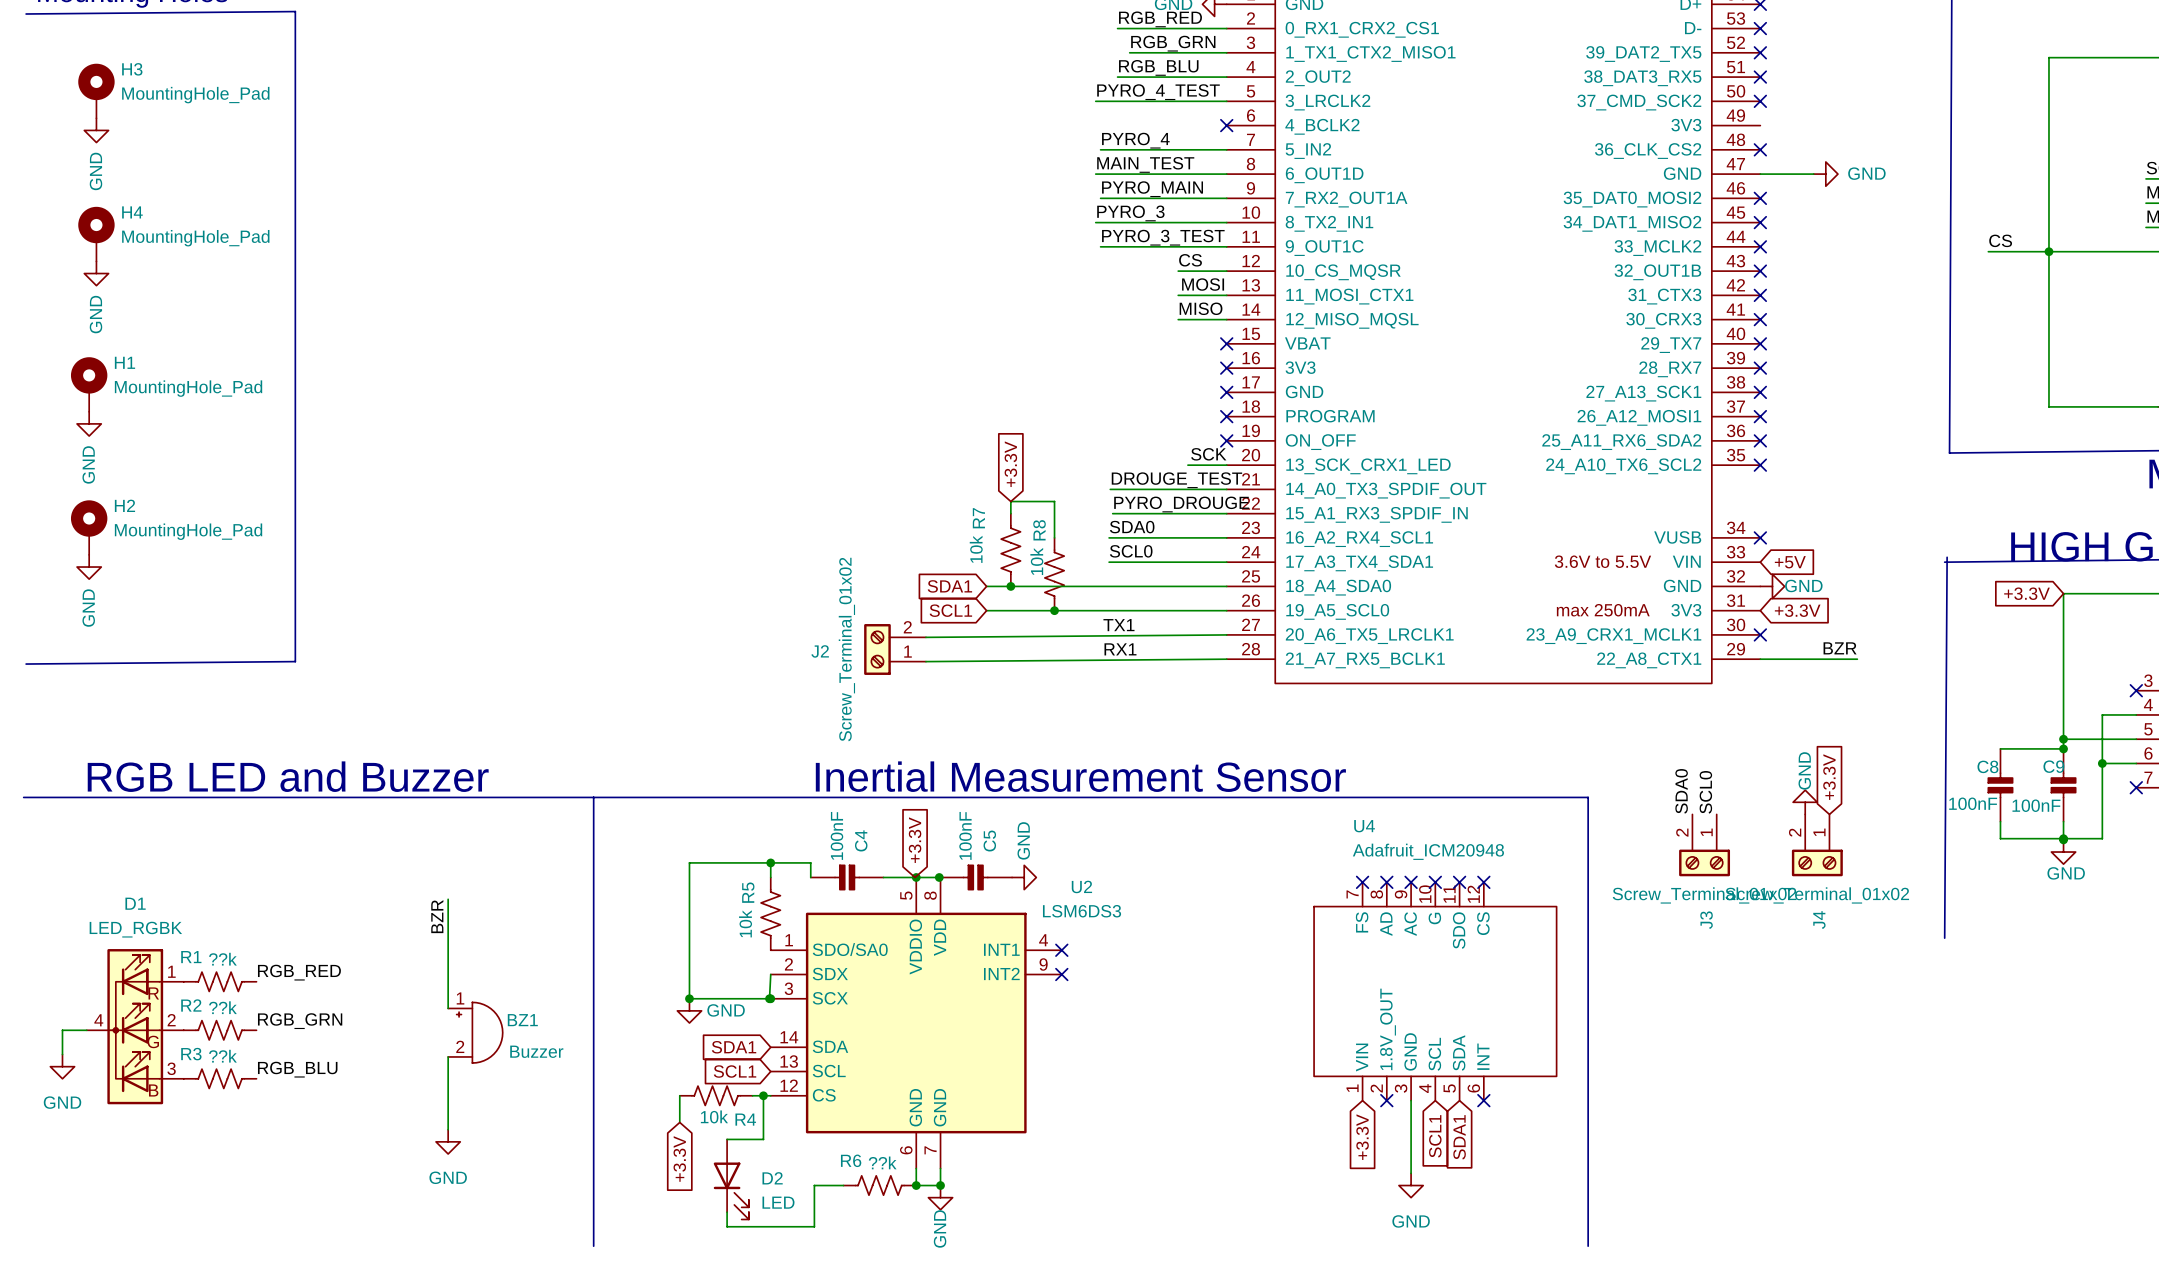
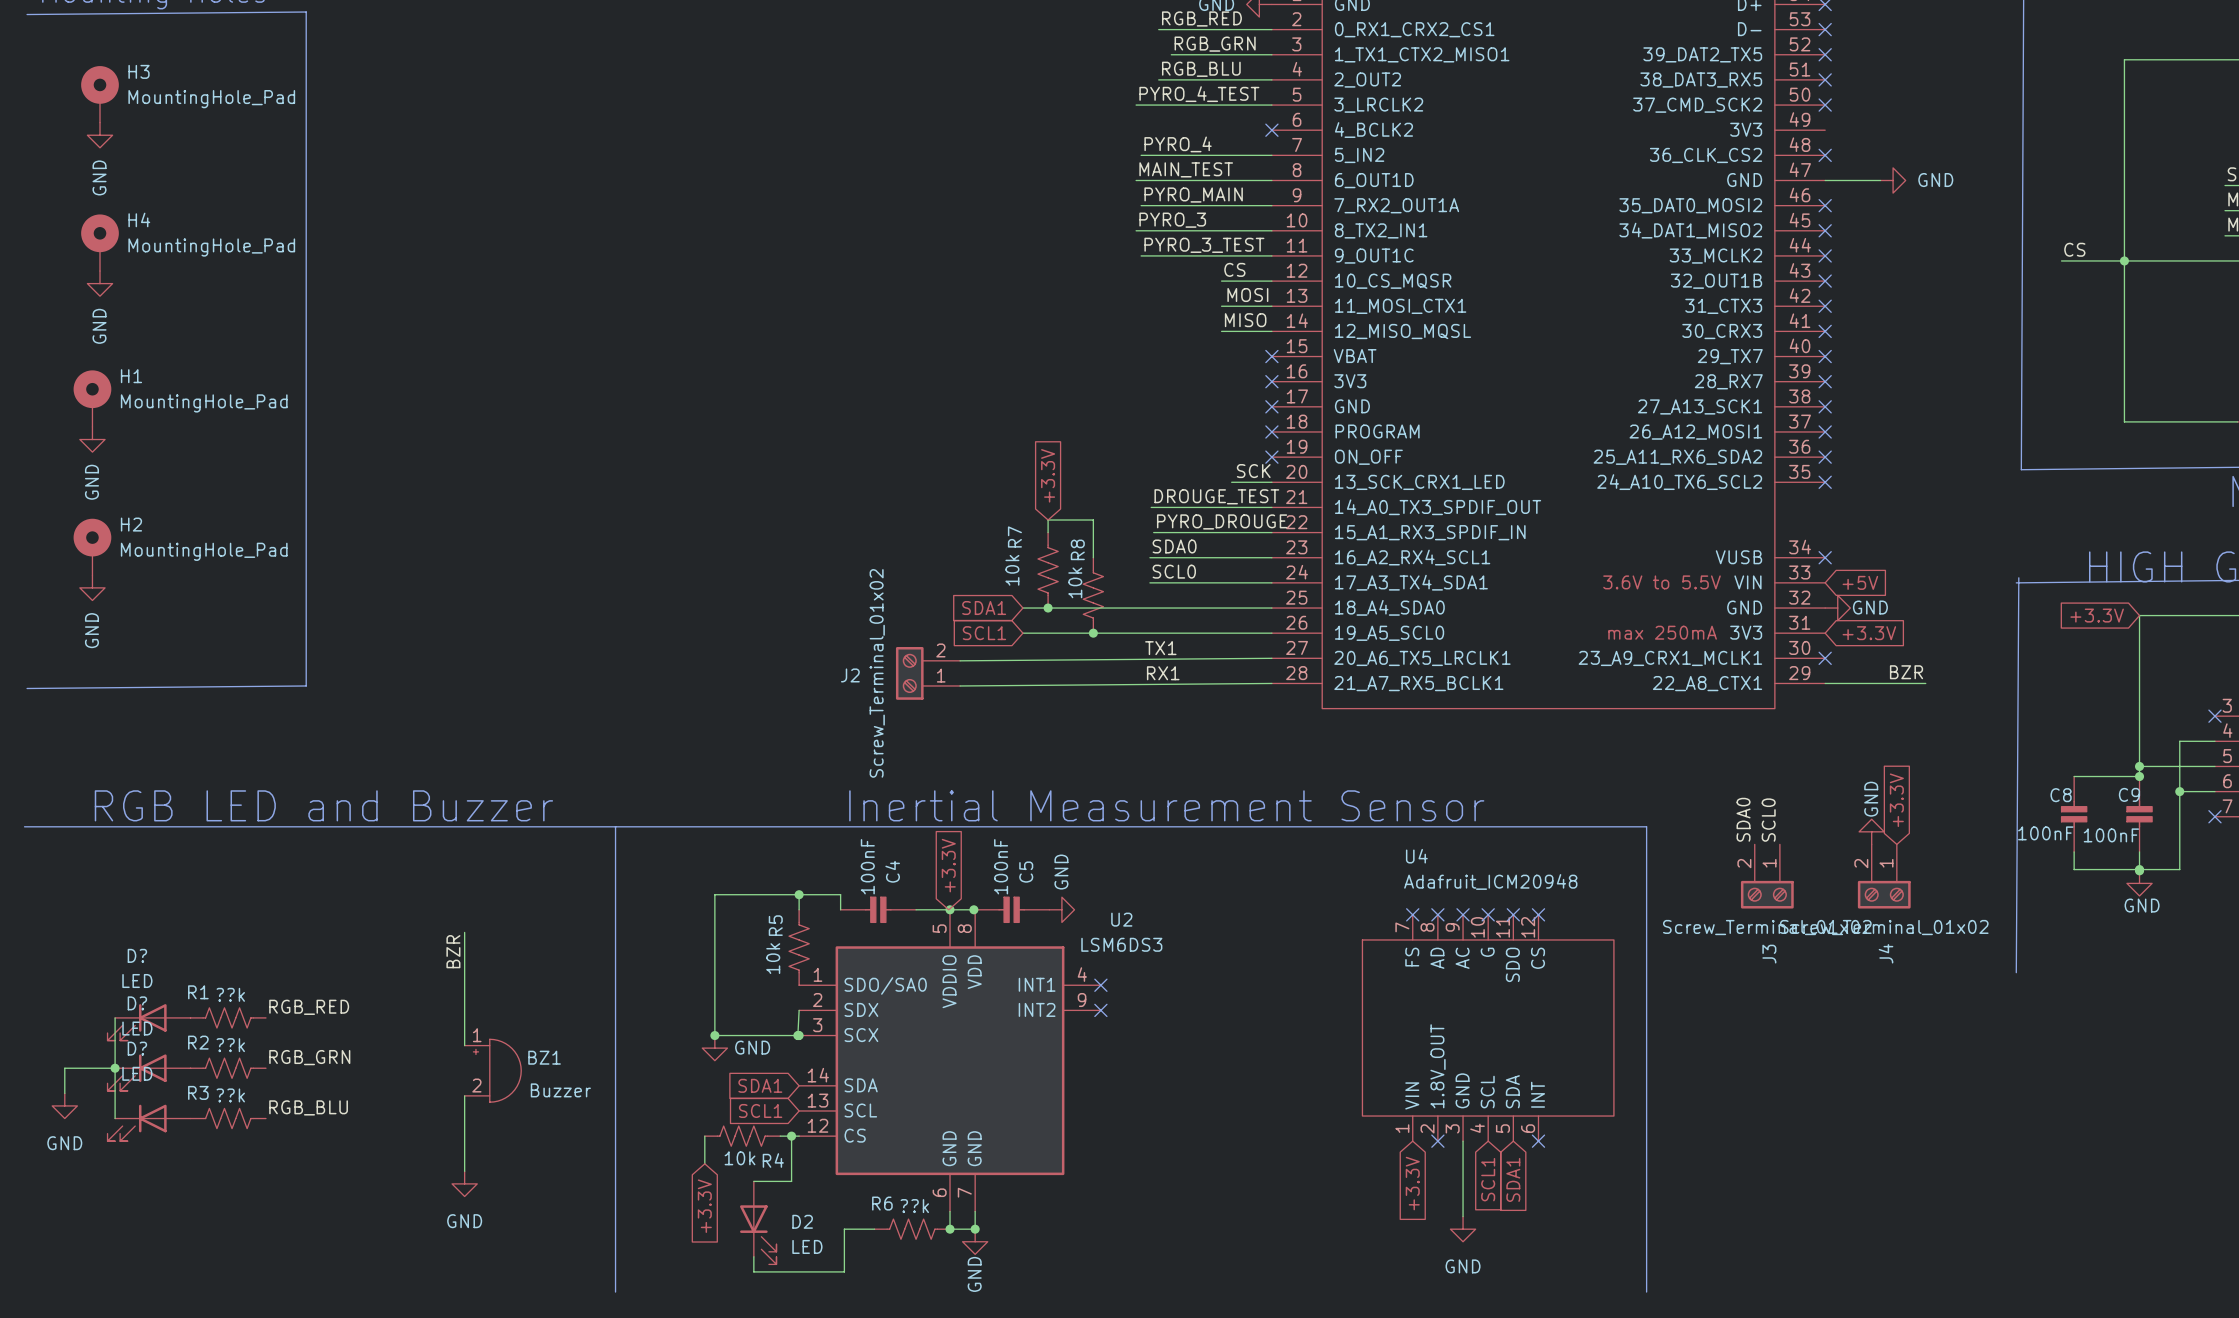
D?: none -> LED (149, 1022)
D1: LED_RGBK (135, 1026) -> none
junction: none -> (115, 1068)
D?: none -> LED (149, 1072)
D?: none -> LED (149, 1122)

